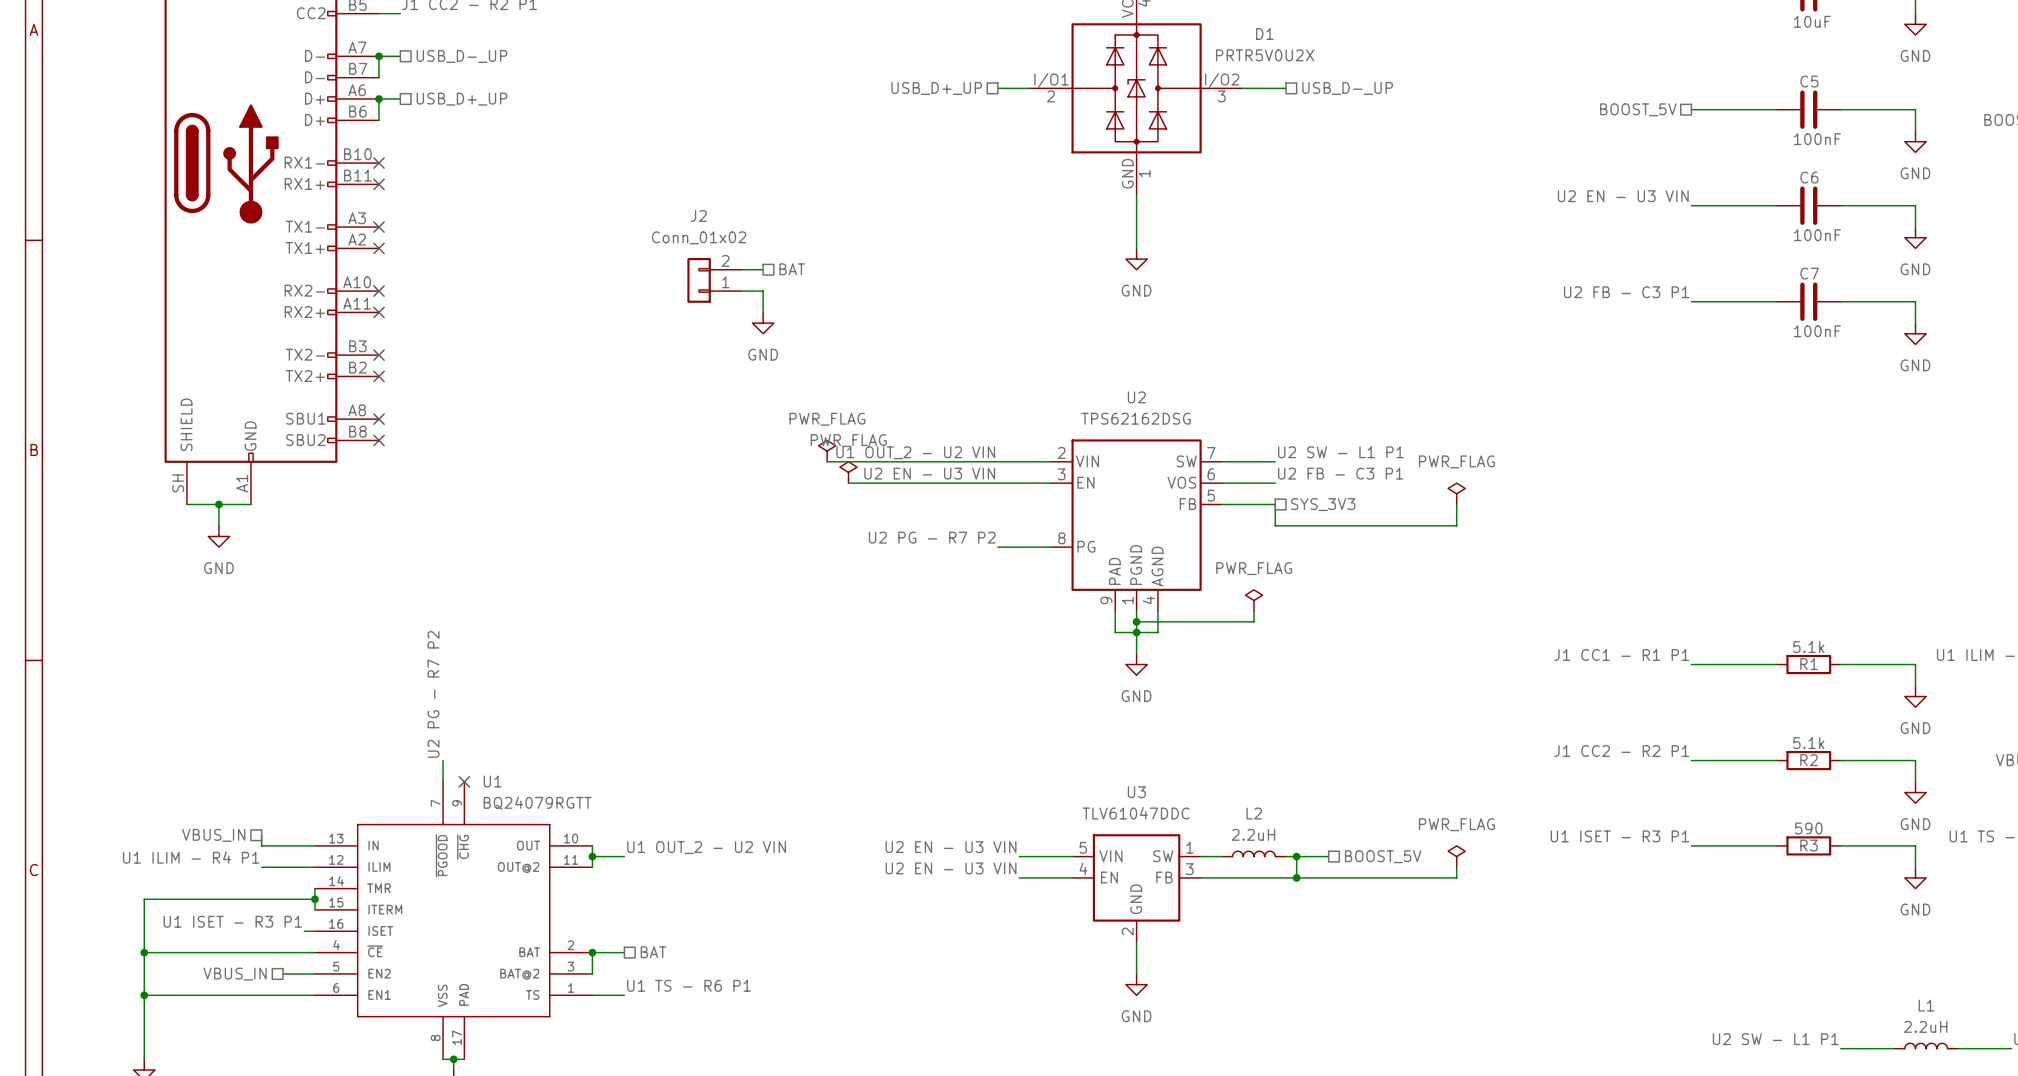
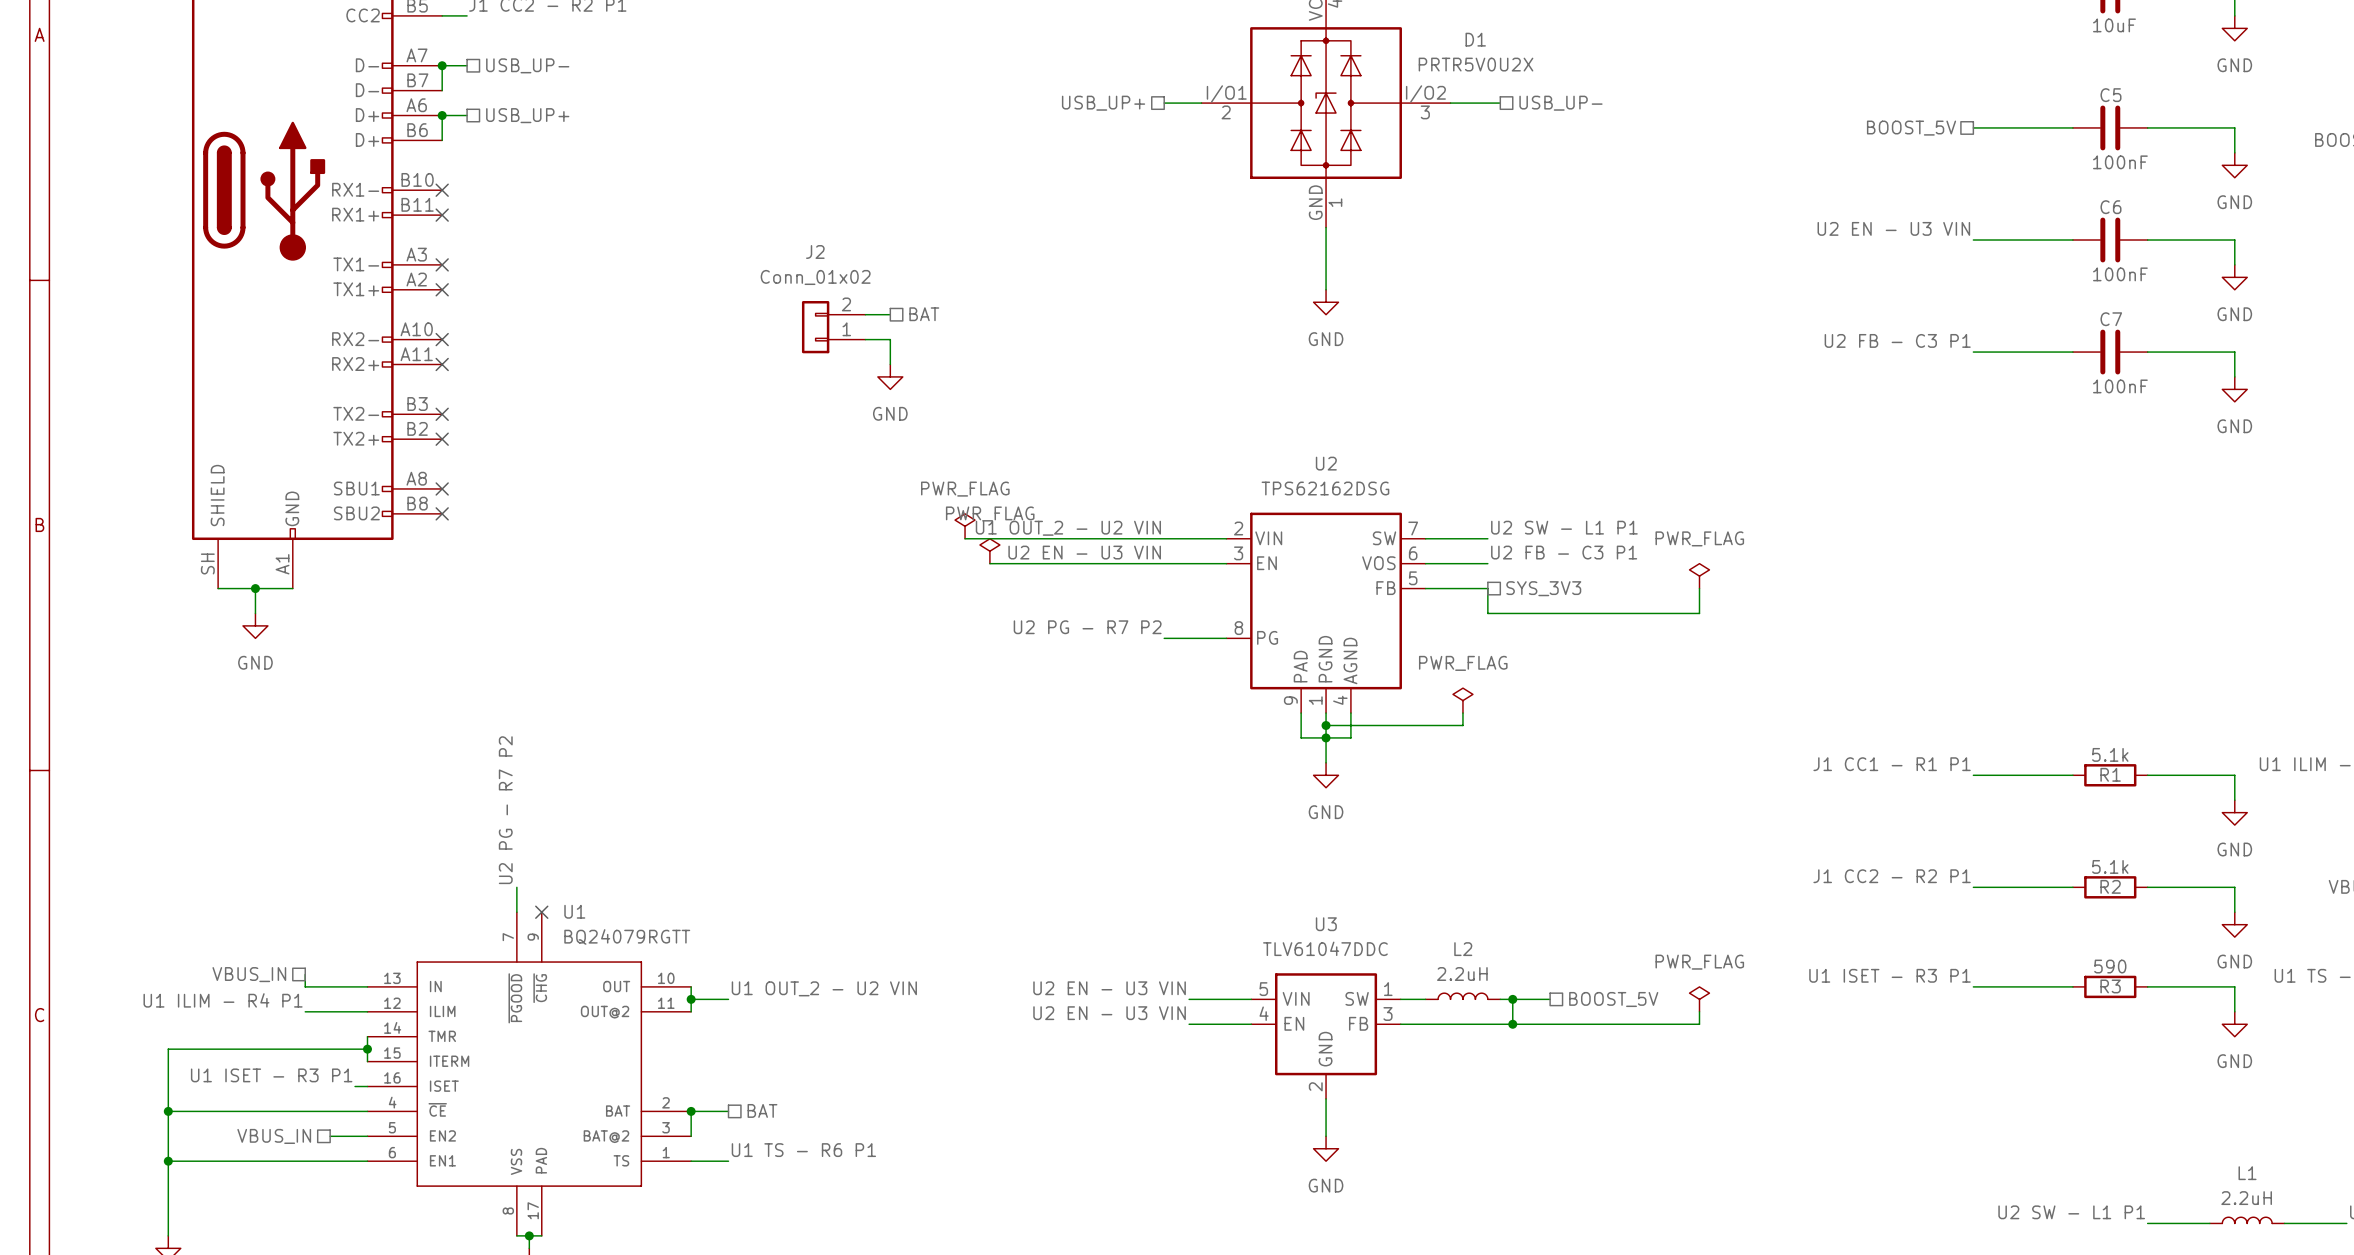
hierarchical label: USB_D-_UP (461, 56) -> USB_UP- (527, 65)
hierarchical label: USB_D+_UP (936, 88) -> USB_UP+ (1103, 103)
hierarchical label: USB_D-_UP (1347, 88) -> USB_UP- (1560, 103)
hierarchical label: USB_D+_UP (461, 99) -> USB_UP+ (527, 115)

